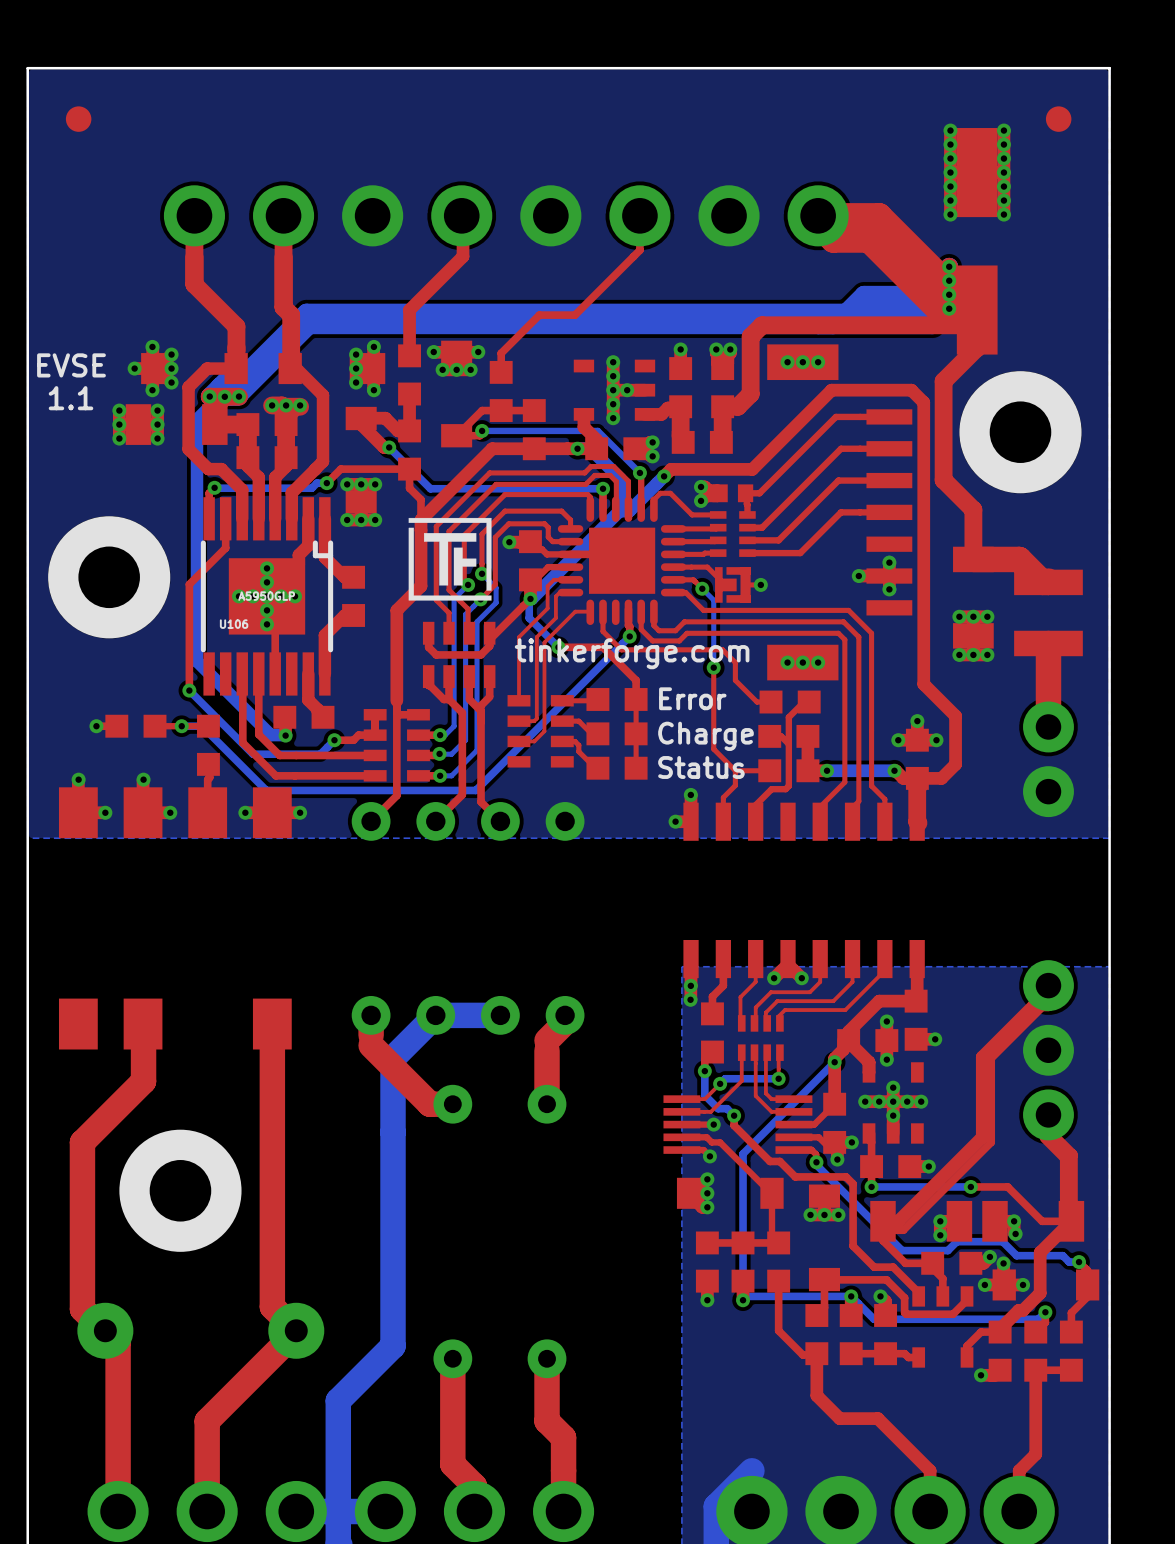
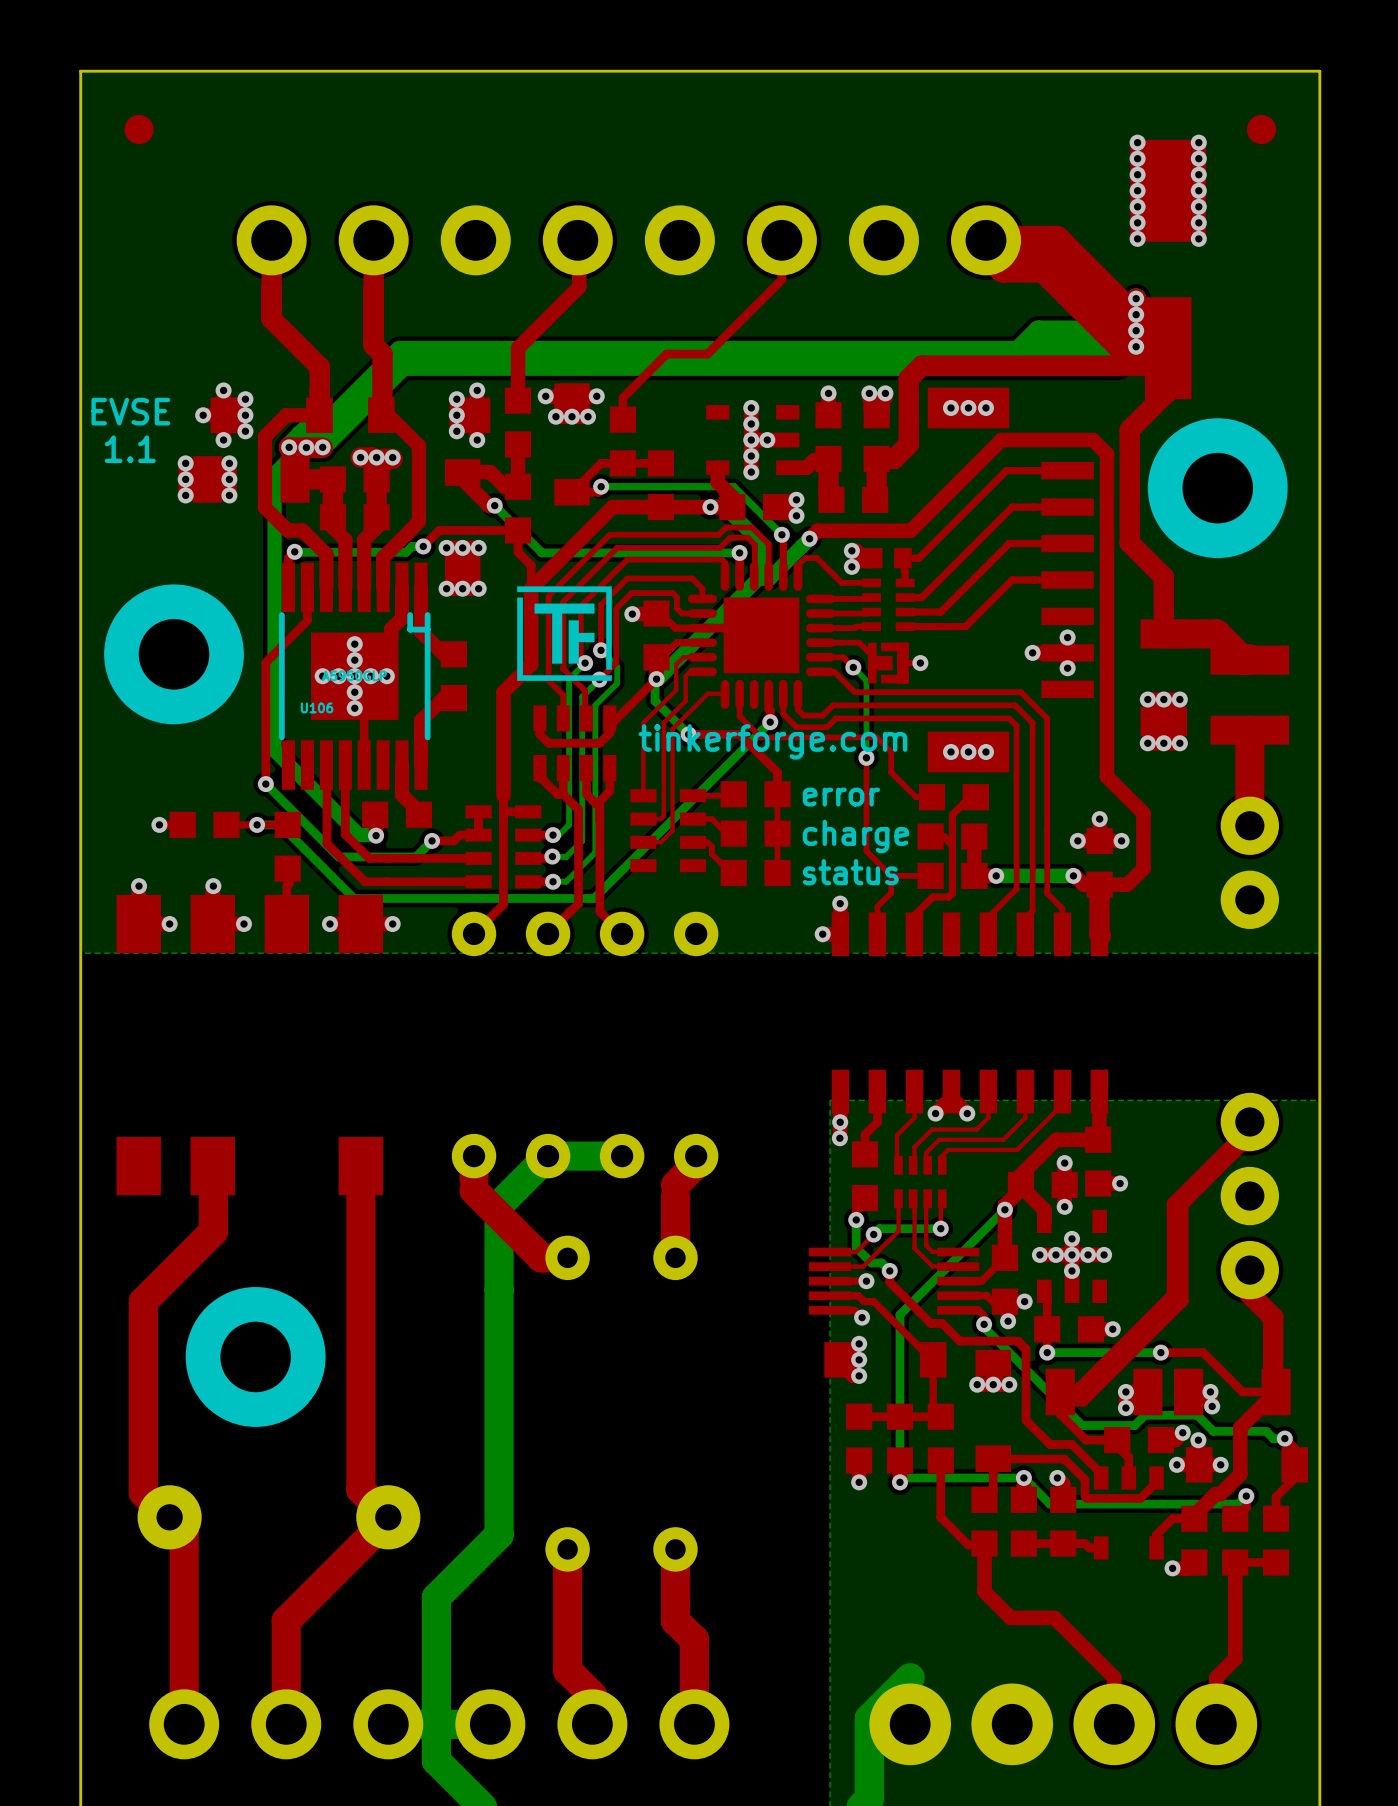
text: Error (692, 698) -> error (841, 797)
text: Charge (705, 736) -> charge (856, 836)
text: Status (701, 767) -> status (850, 872)

